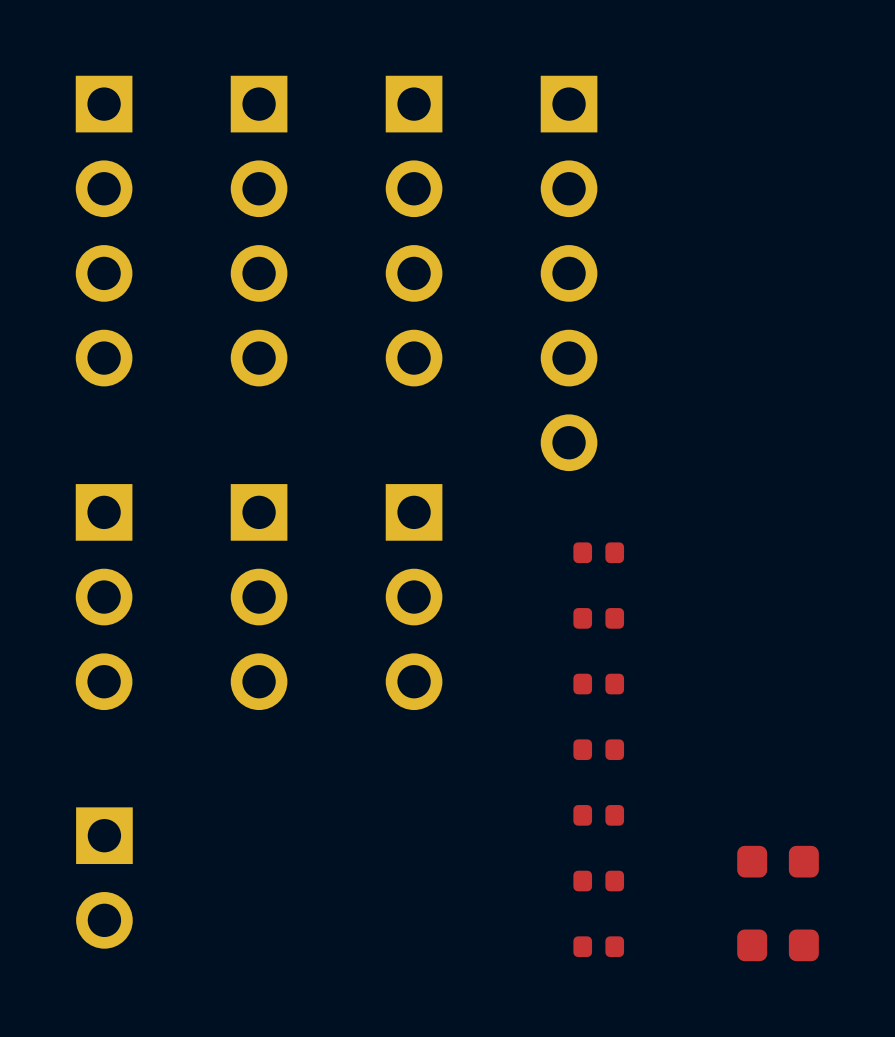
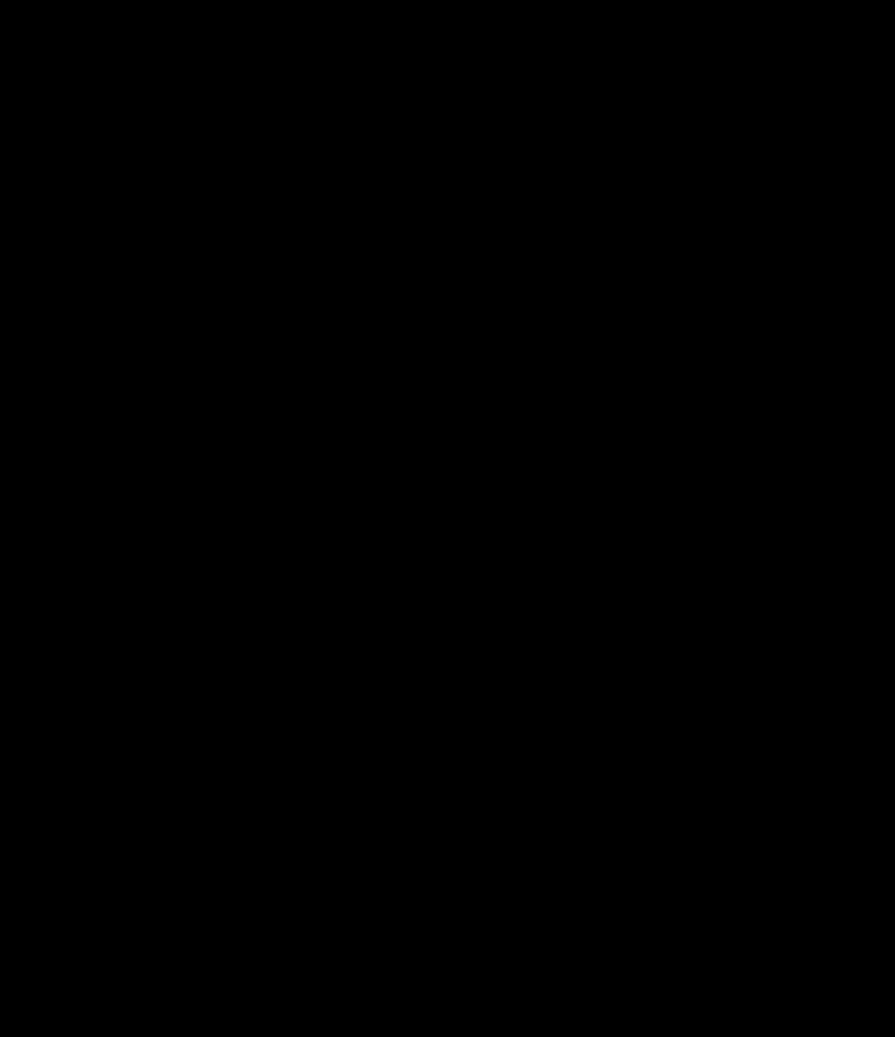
part: (104, 231) -> none
part: (259, 231) -> none
part: (414, 231) -> none
part: (569, 273) -> none
part: (598, 552) -> none
part: (104, 597) -> none
part: (259, 597) -> none
part: (414, 597) -> none
part: (598, 618) -> none
part: (598, 684) -> none
part: (598, 749) -> none
part: (598, 815) -> none
part: (778, 861) -> none
part: (104, 878) -> none
part: (598, 881) -> none
part: (778, 945) -> none
part: (598, 946) -> none

